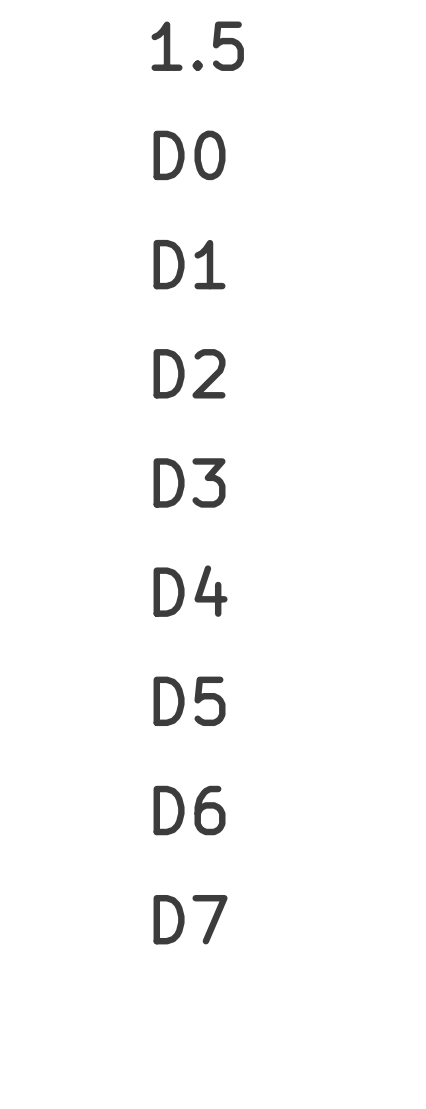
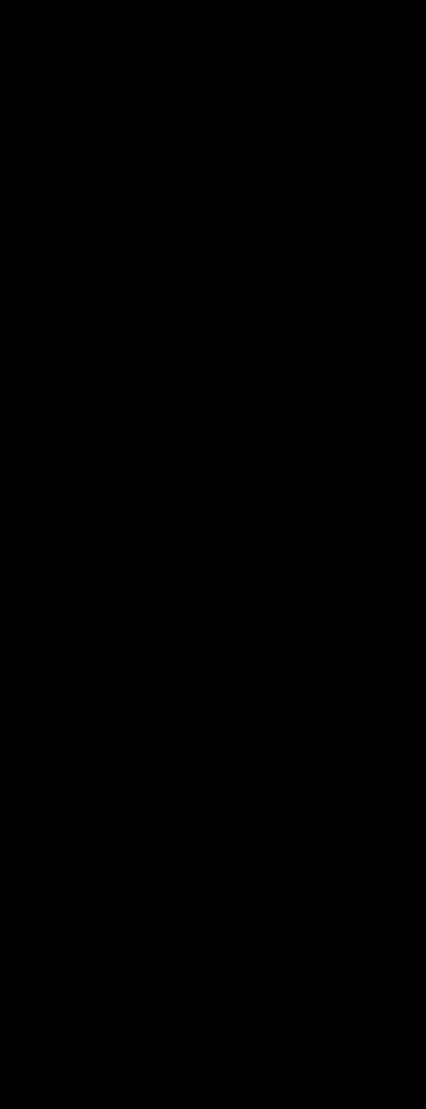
text: 1.5 (197, 46) -> none
text: D0 (189, 155) -> none
text: D1 (189, 264) -> none
text: D2 (189, 373) -> none
text: D3 (189, 482) -> none
text: D4 (190, 591) -> none
text: D5 (189, 701) -> none
text: D6 (189, 810) -> none
text: D7 (190, 919) -> none

